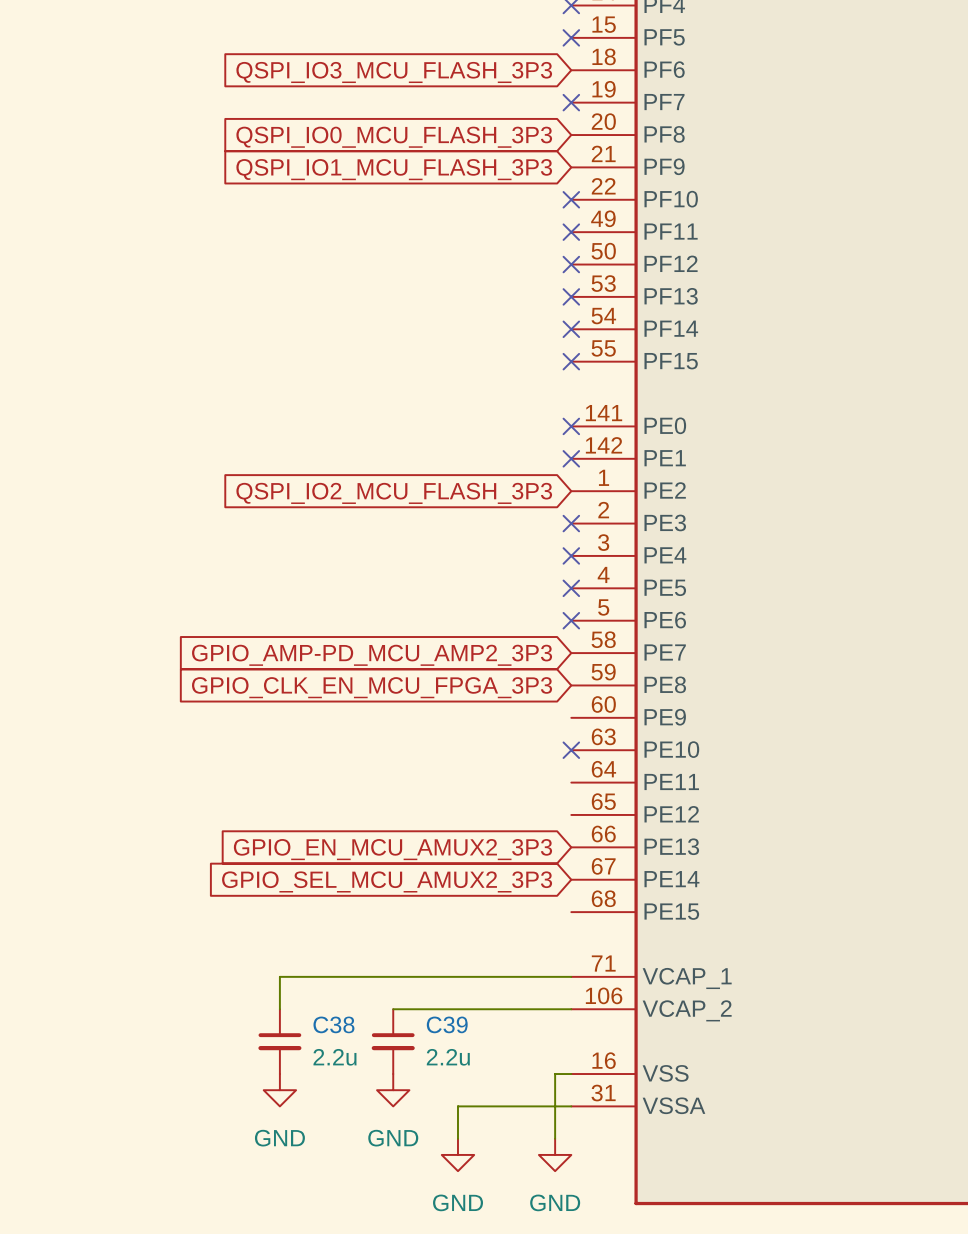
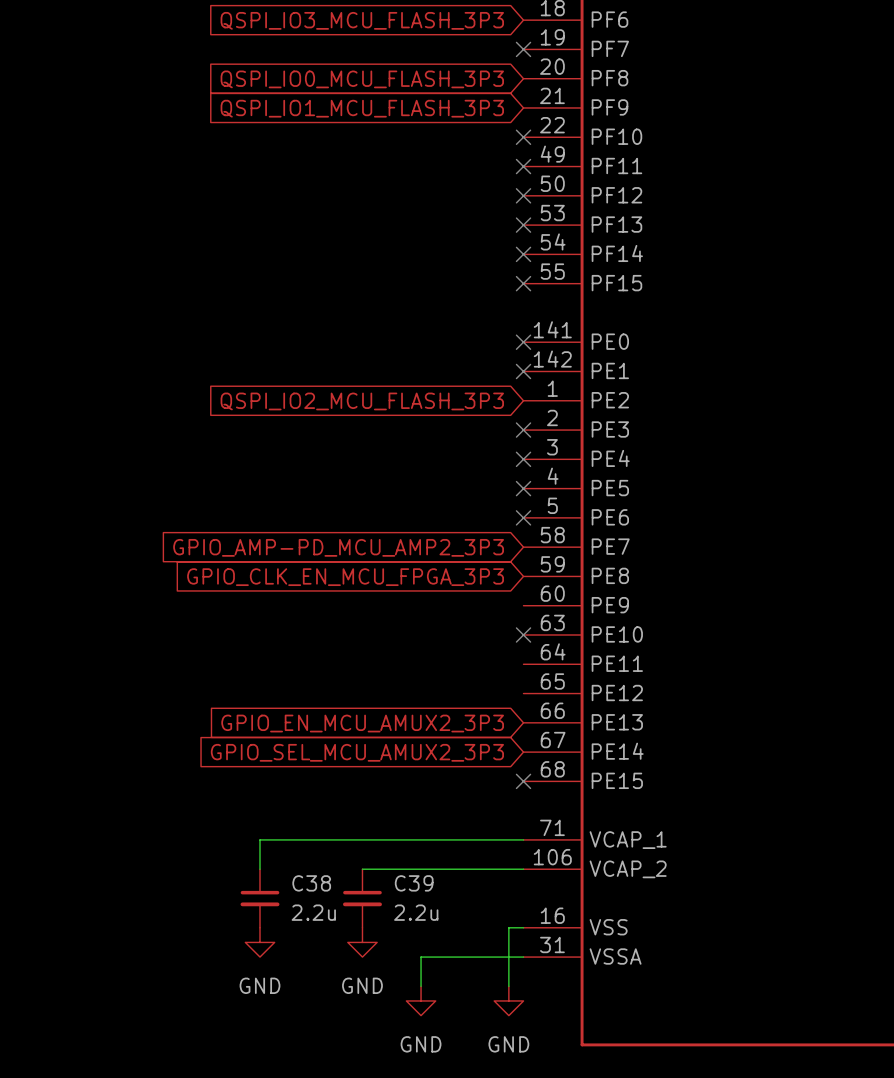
no-connect mark: none -> (523, 781)

